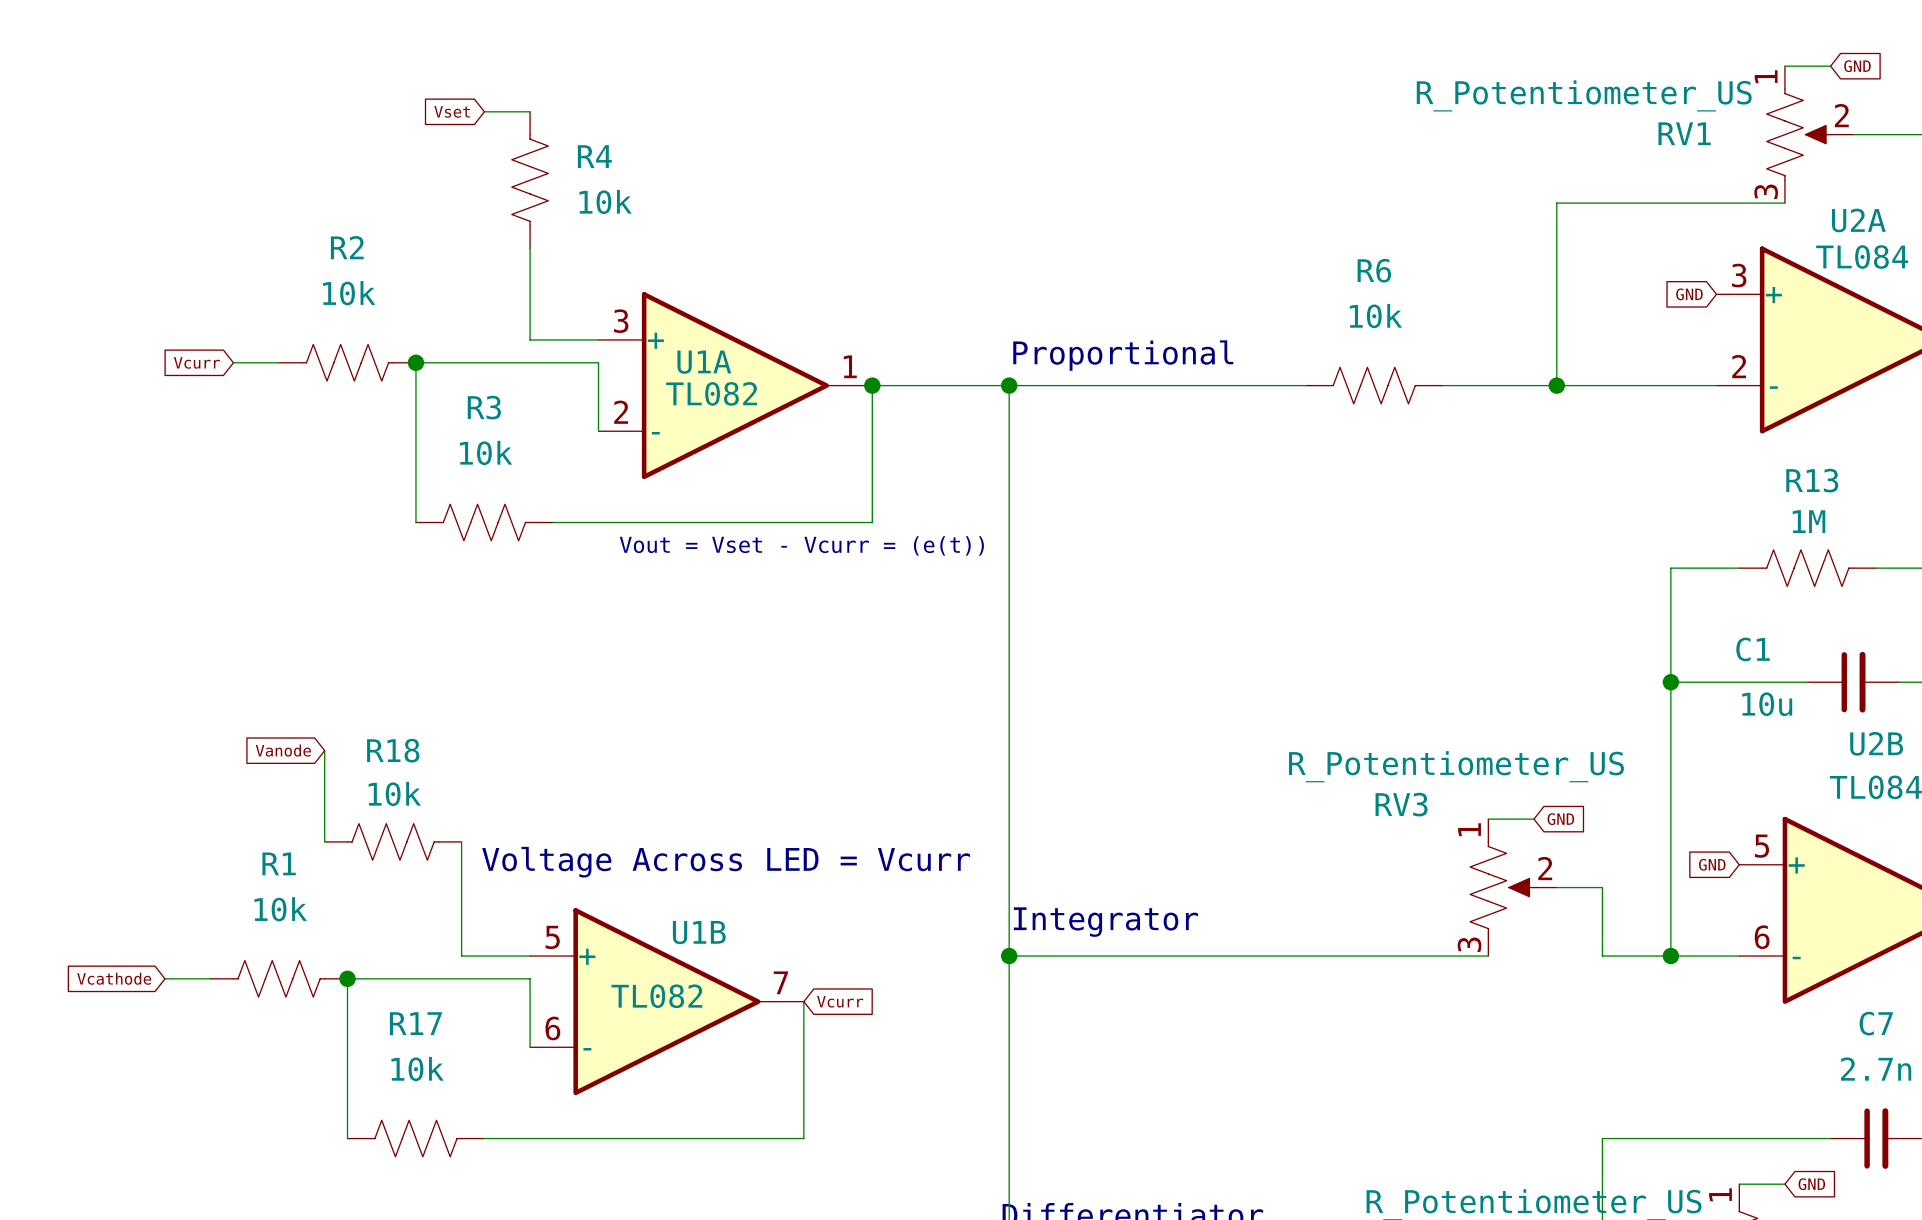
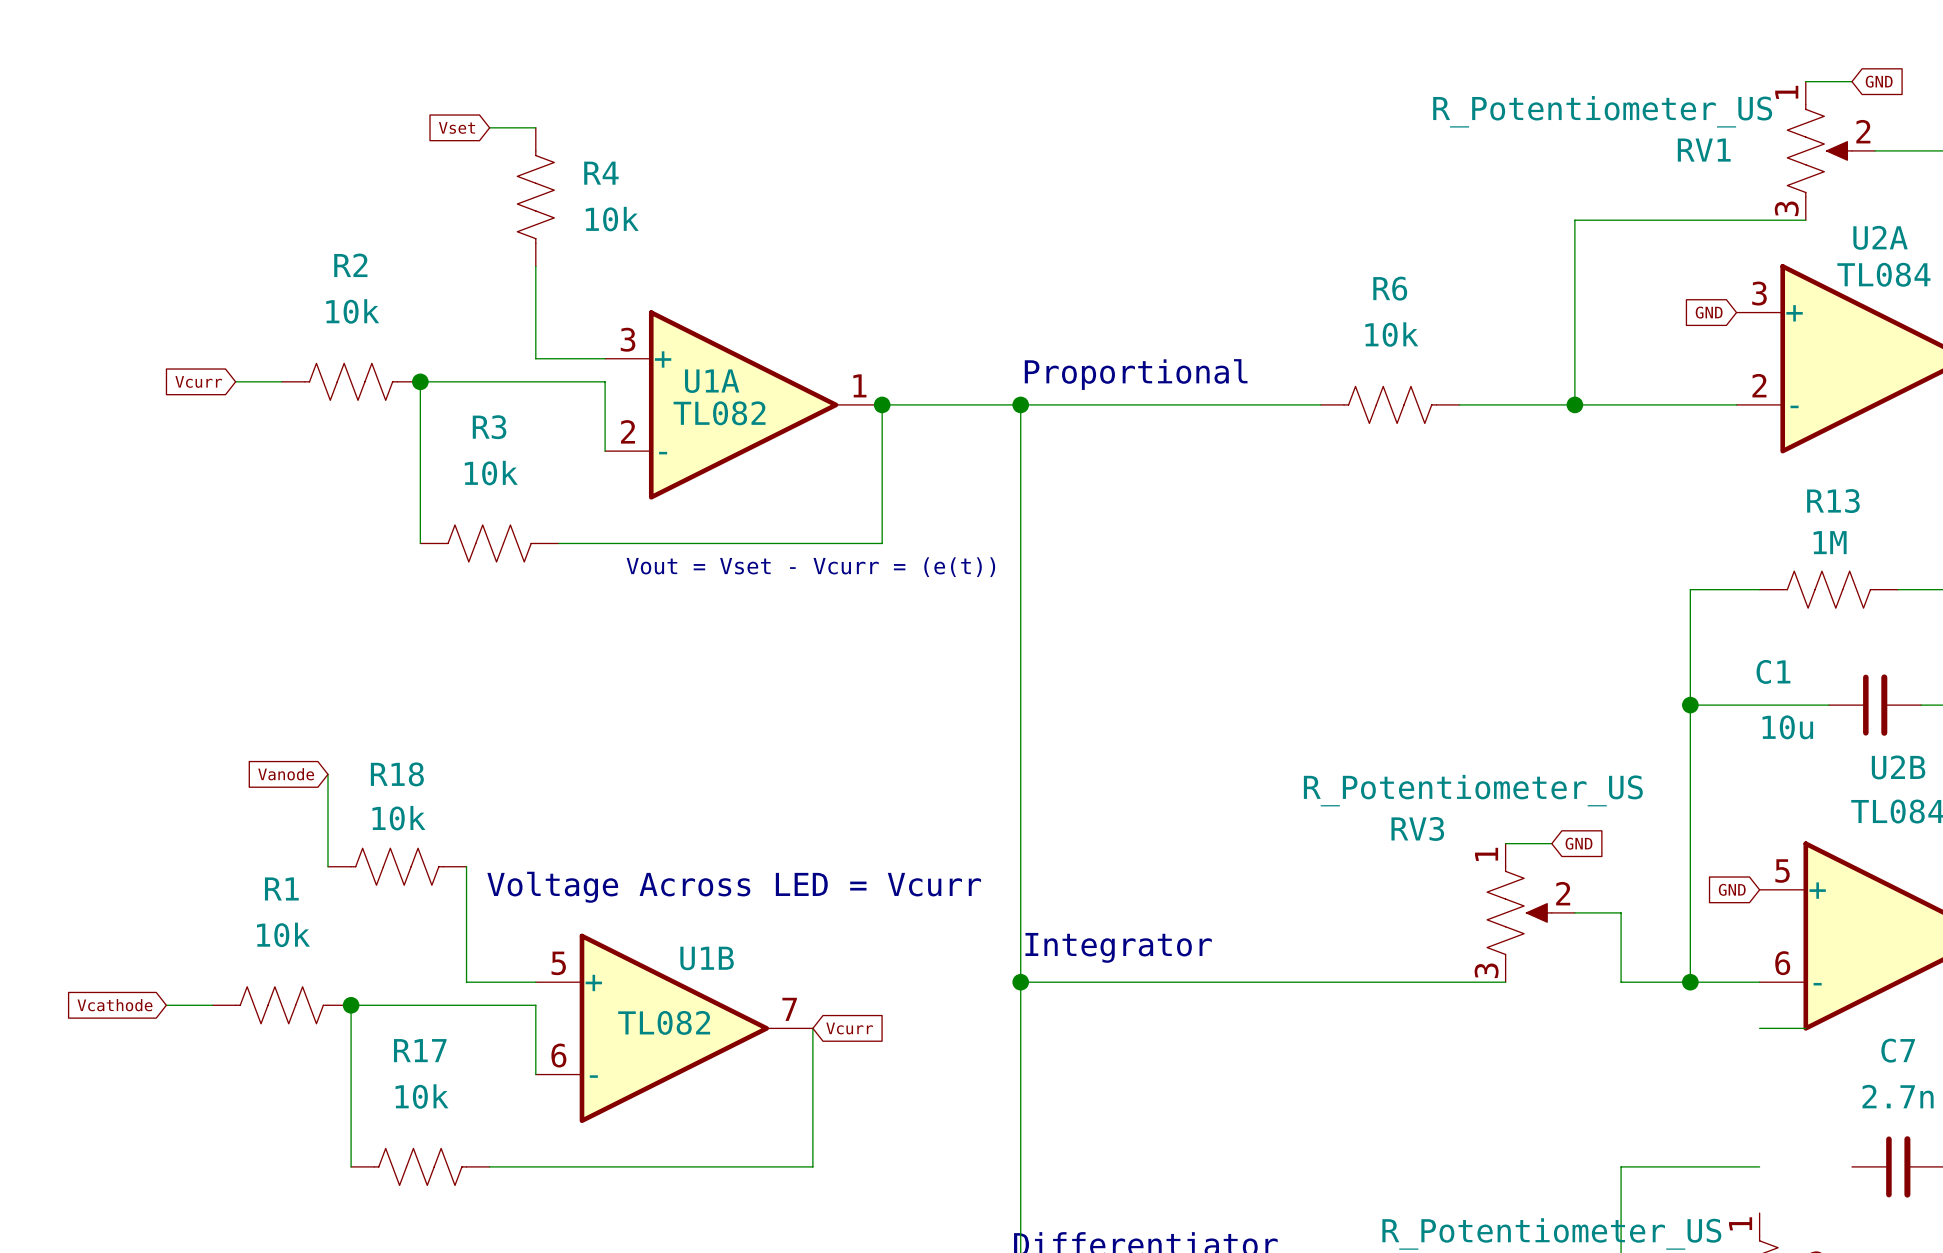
wire: (1739, 1138) (1830, 1138) -> none
wire: (1739, 1184) (1784, 1184) -> (1759, 1028) (1805, 1028)
global label: GND (1811, 1184) -> none

